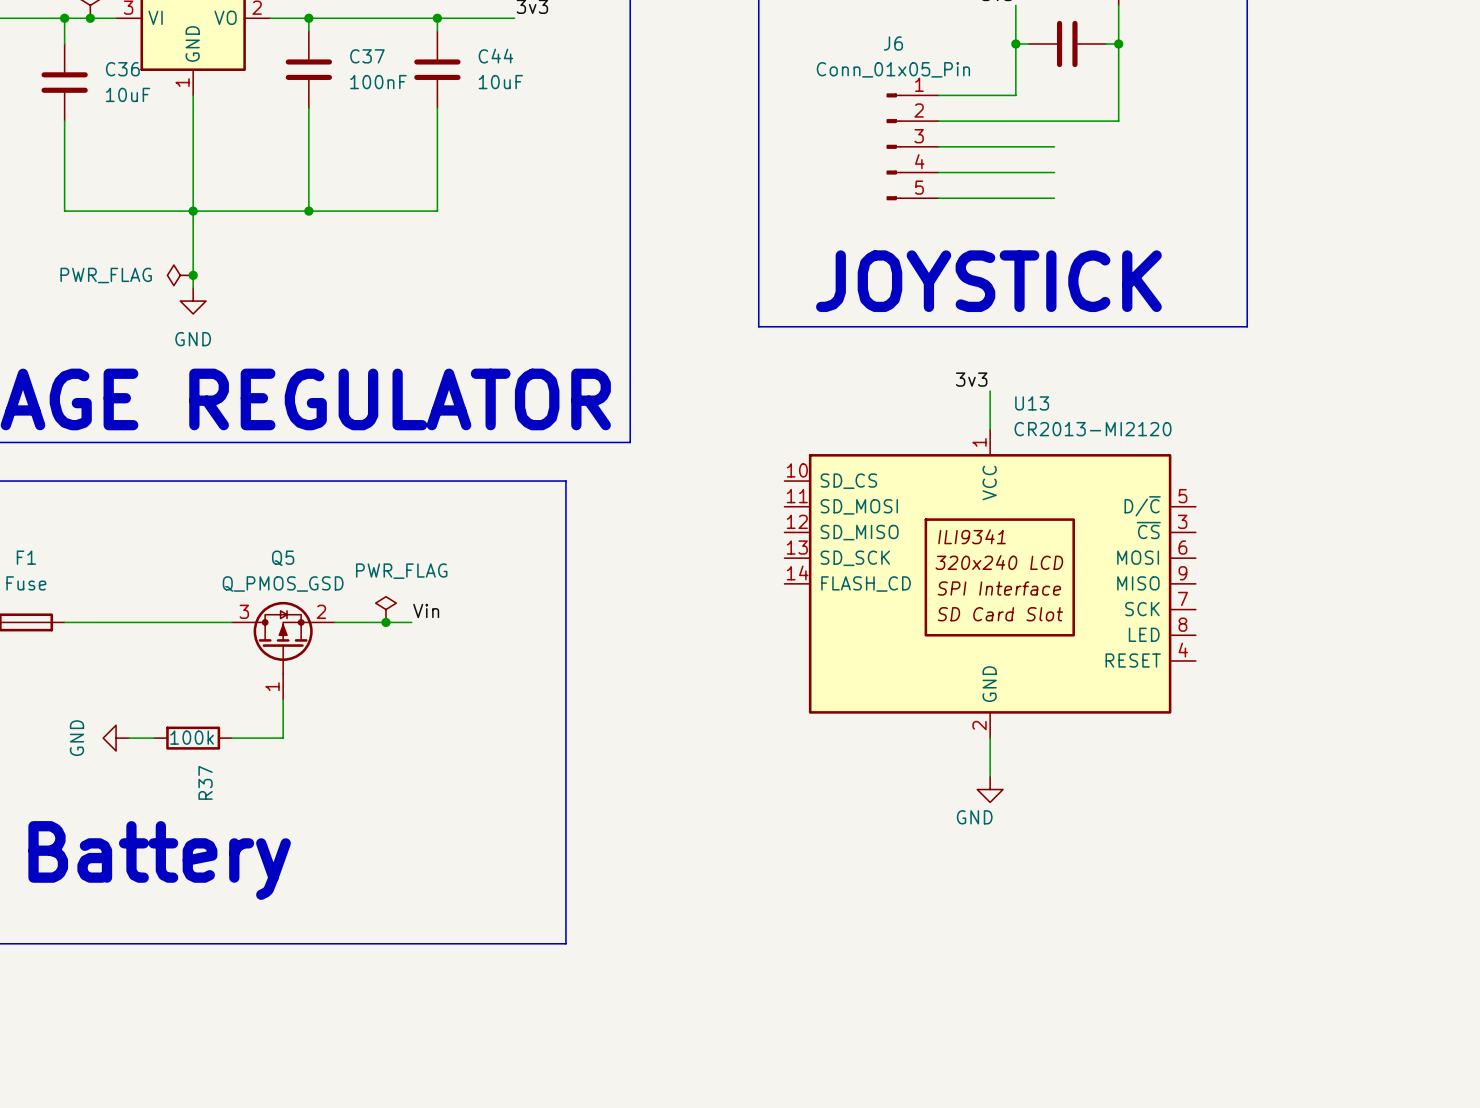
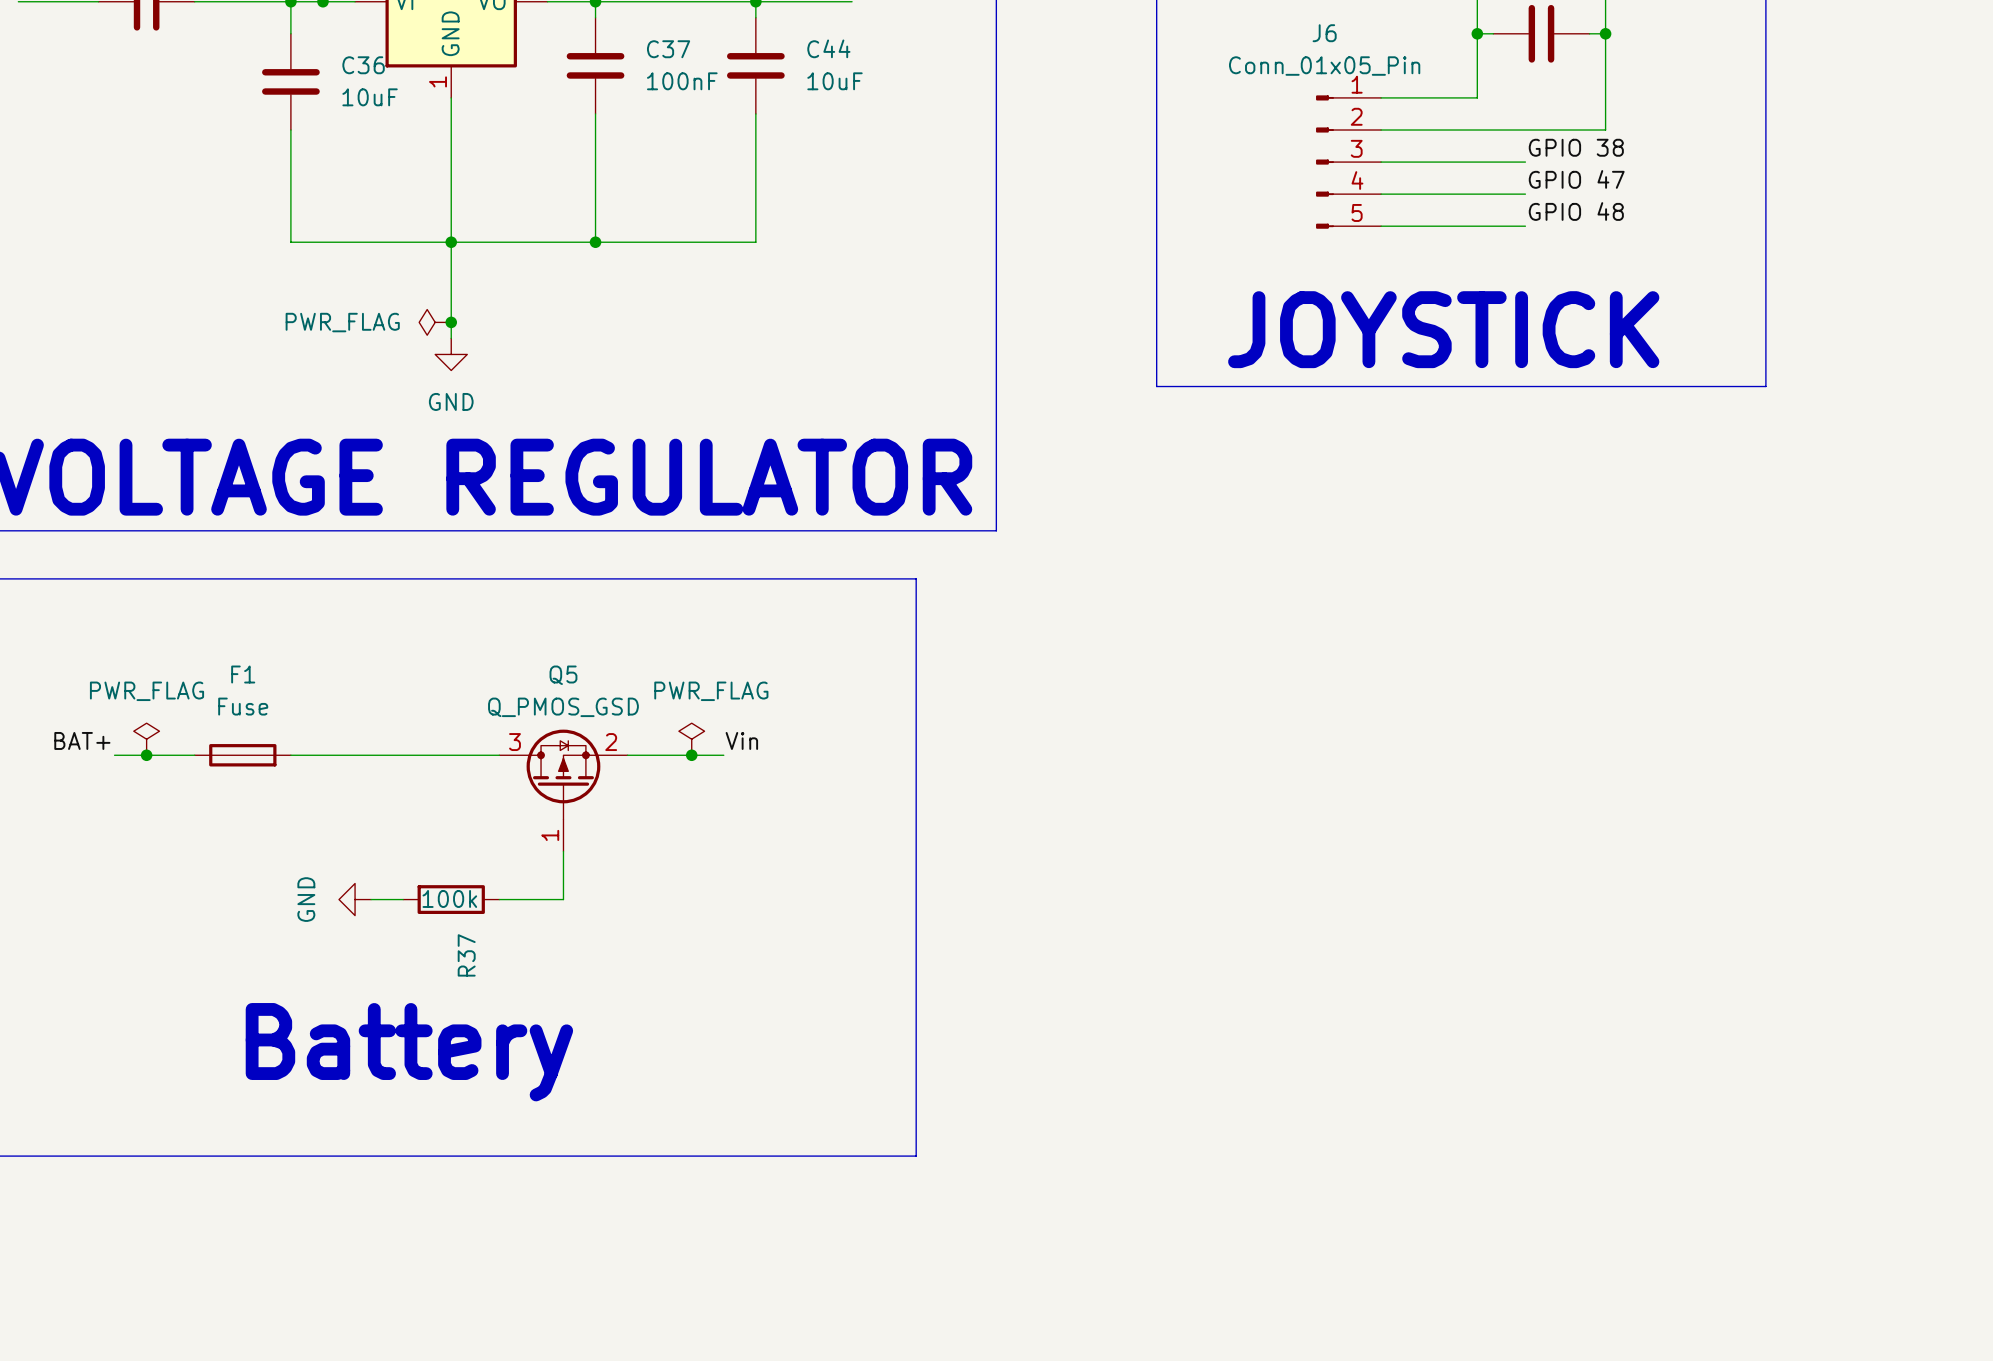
label: none -> GPIO 38 (1576, 147)
label: none -> GPIO 47 (1576, 179)
label: none -> GPIO 48 (1576, 211)
label: 3v3 (971, 379) -> none
wire: (990, 391) (990, 429) -> none
U13: CR2013-MI2120 (990, 583) -> none
wire: (990, 738) (990, 776) -> none
power symbol: GND (990, 789) -> none

